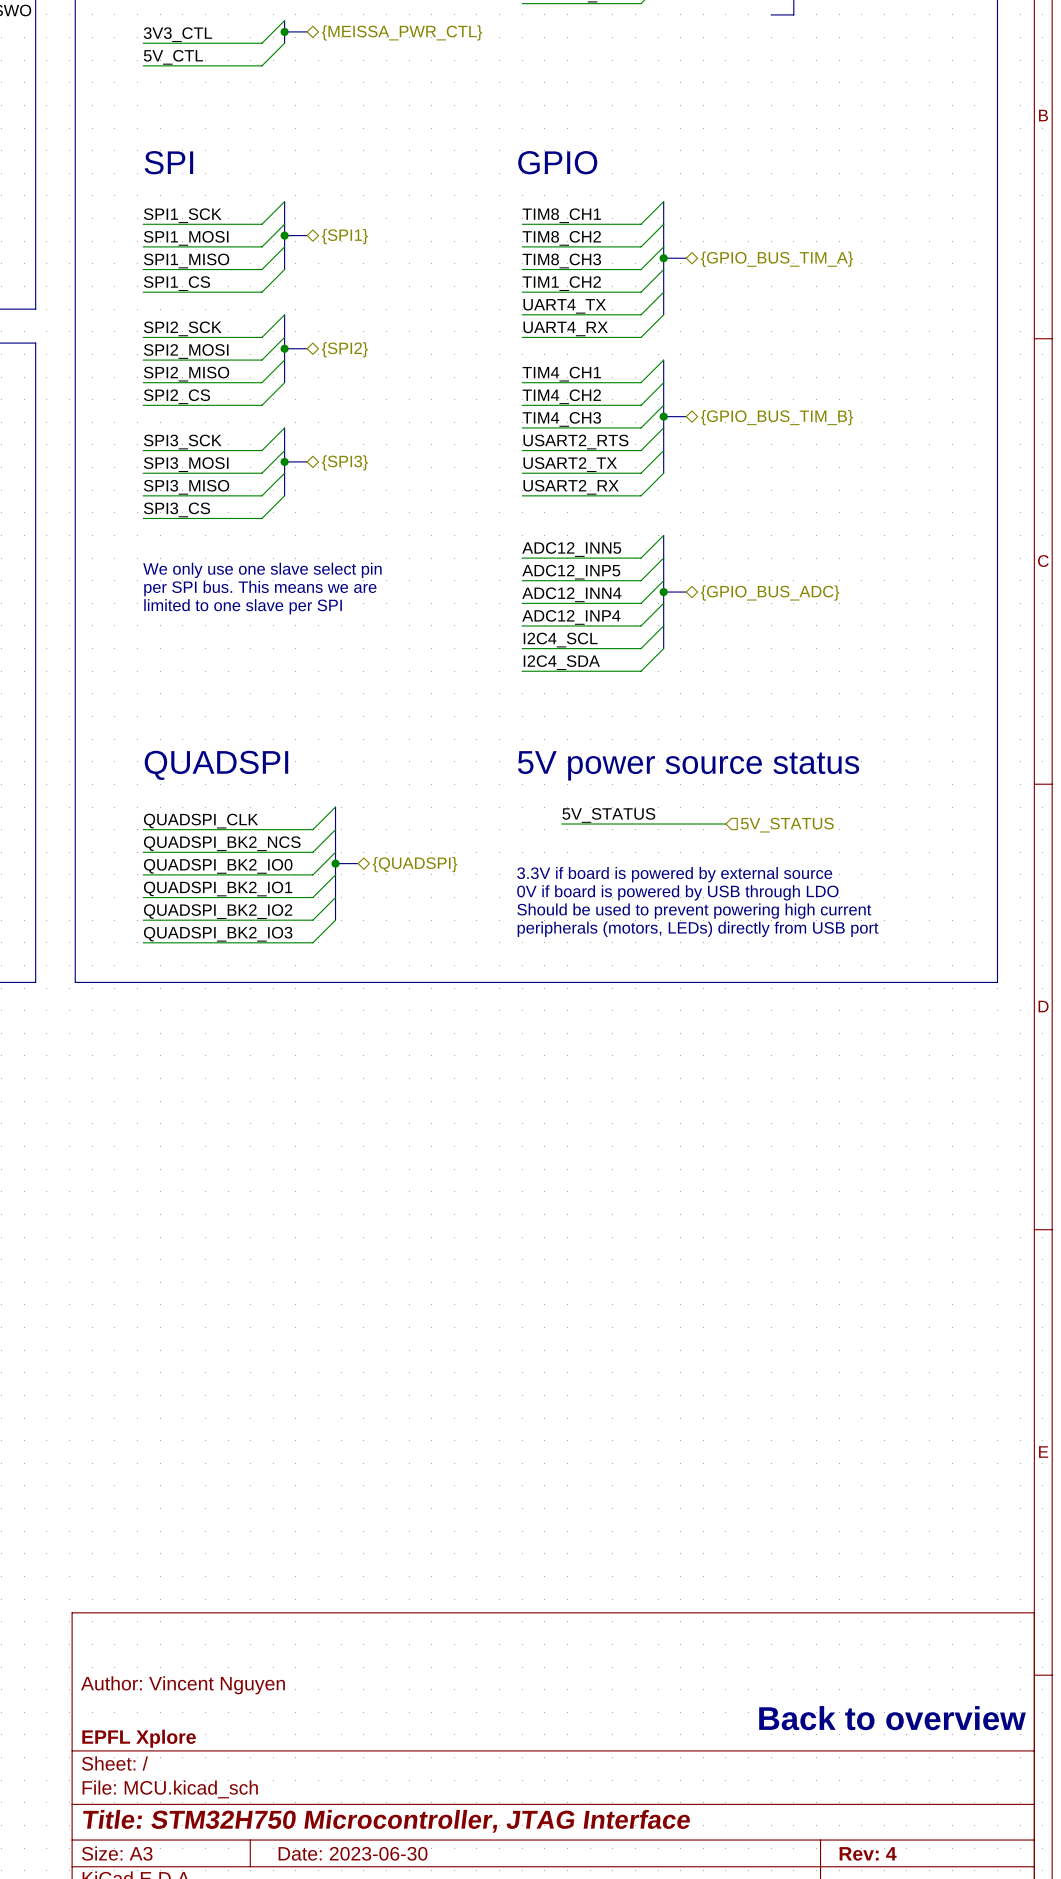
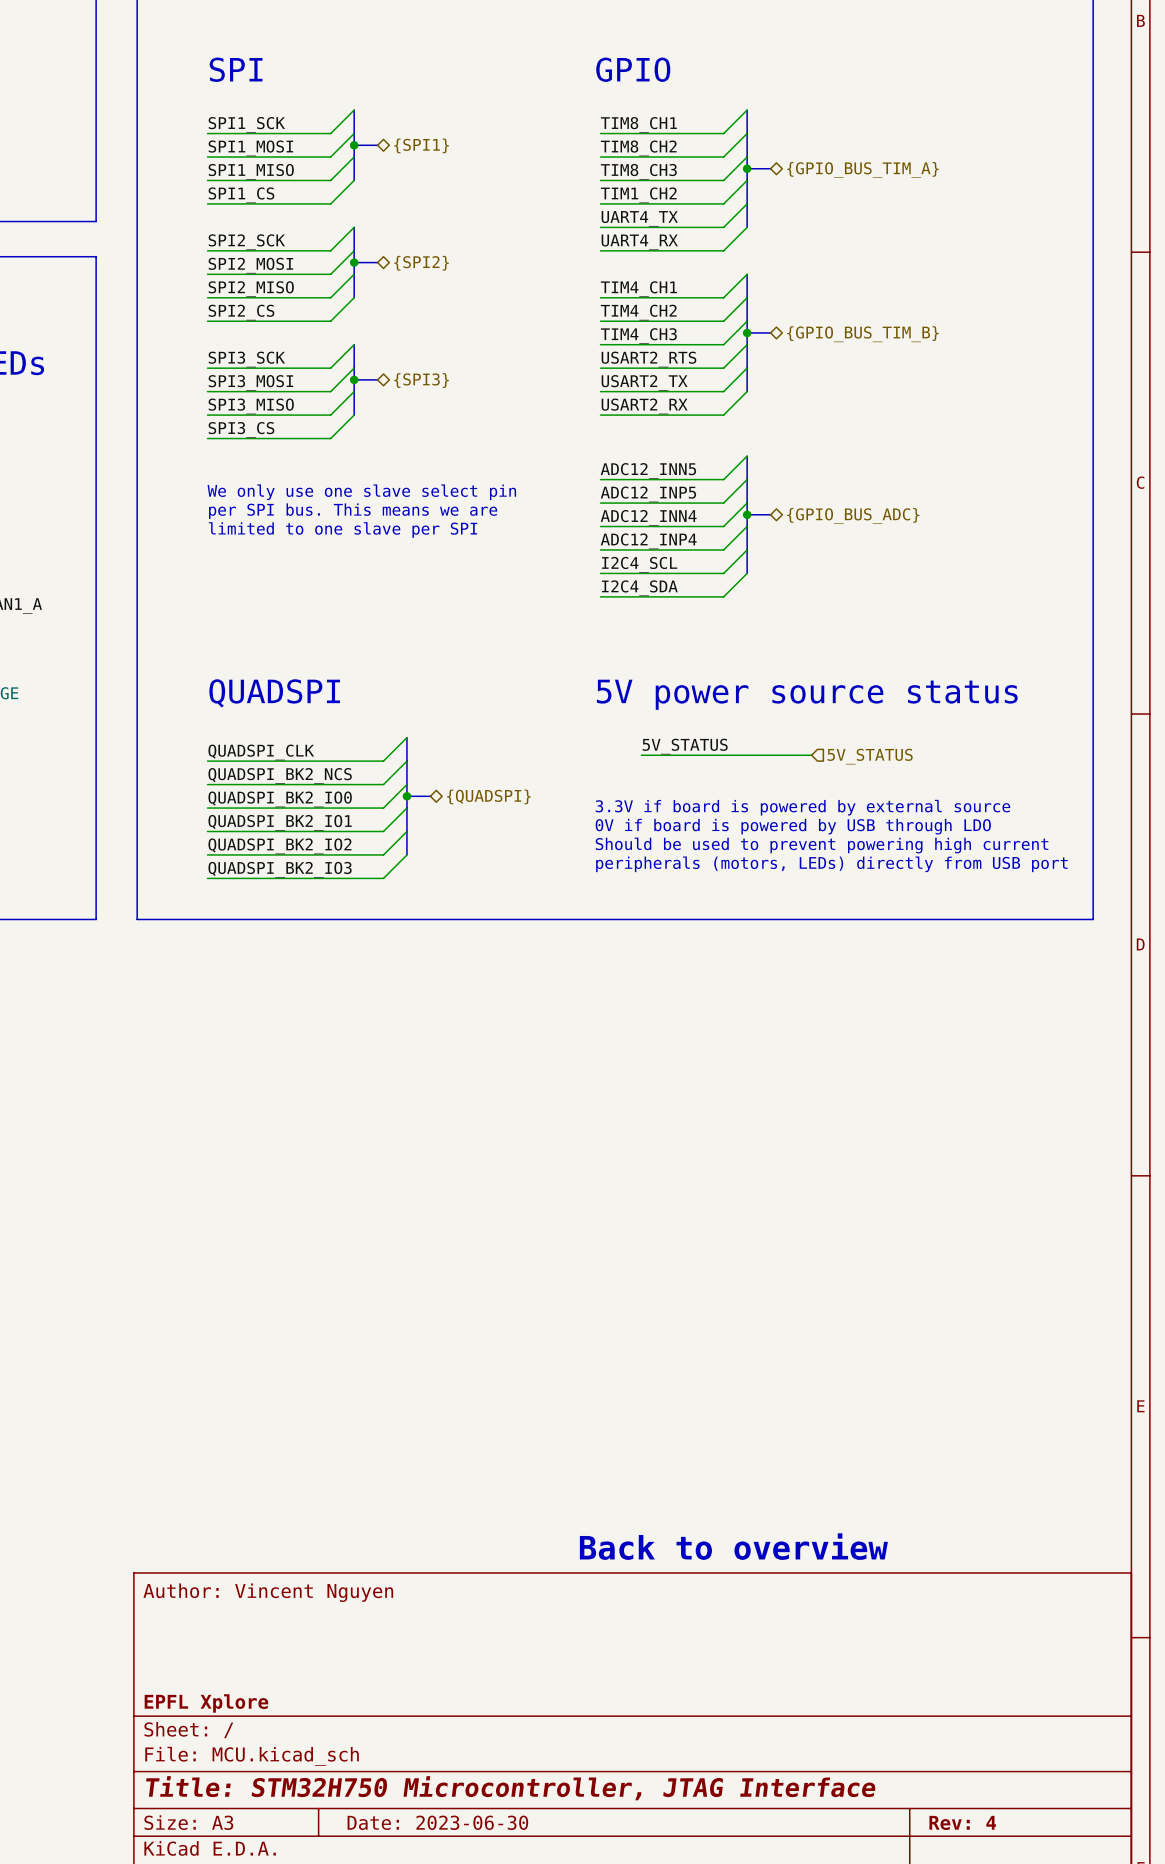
text: none -> Back to overview (733, 1546)
title block position: Author: Vincent Nguyen (182, 1685) -> Author: Vincent Nguyen (268, 1592)
text: Back to overview (892, 1718) -> none

